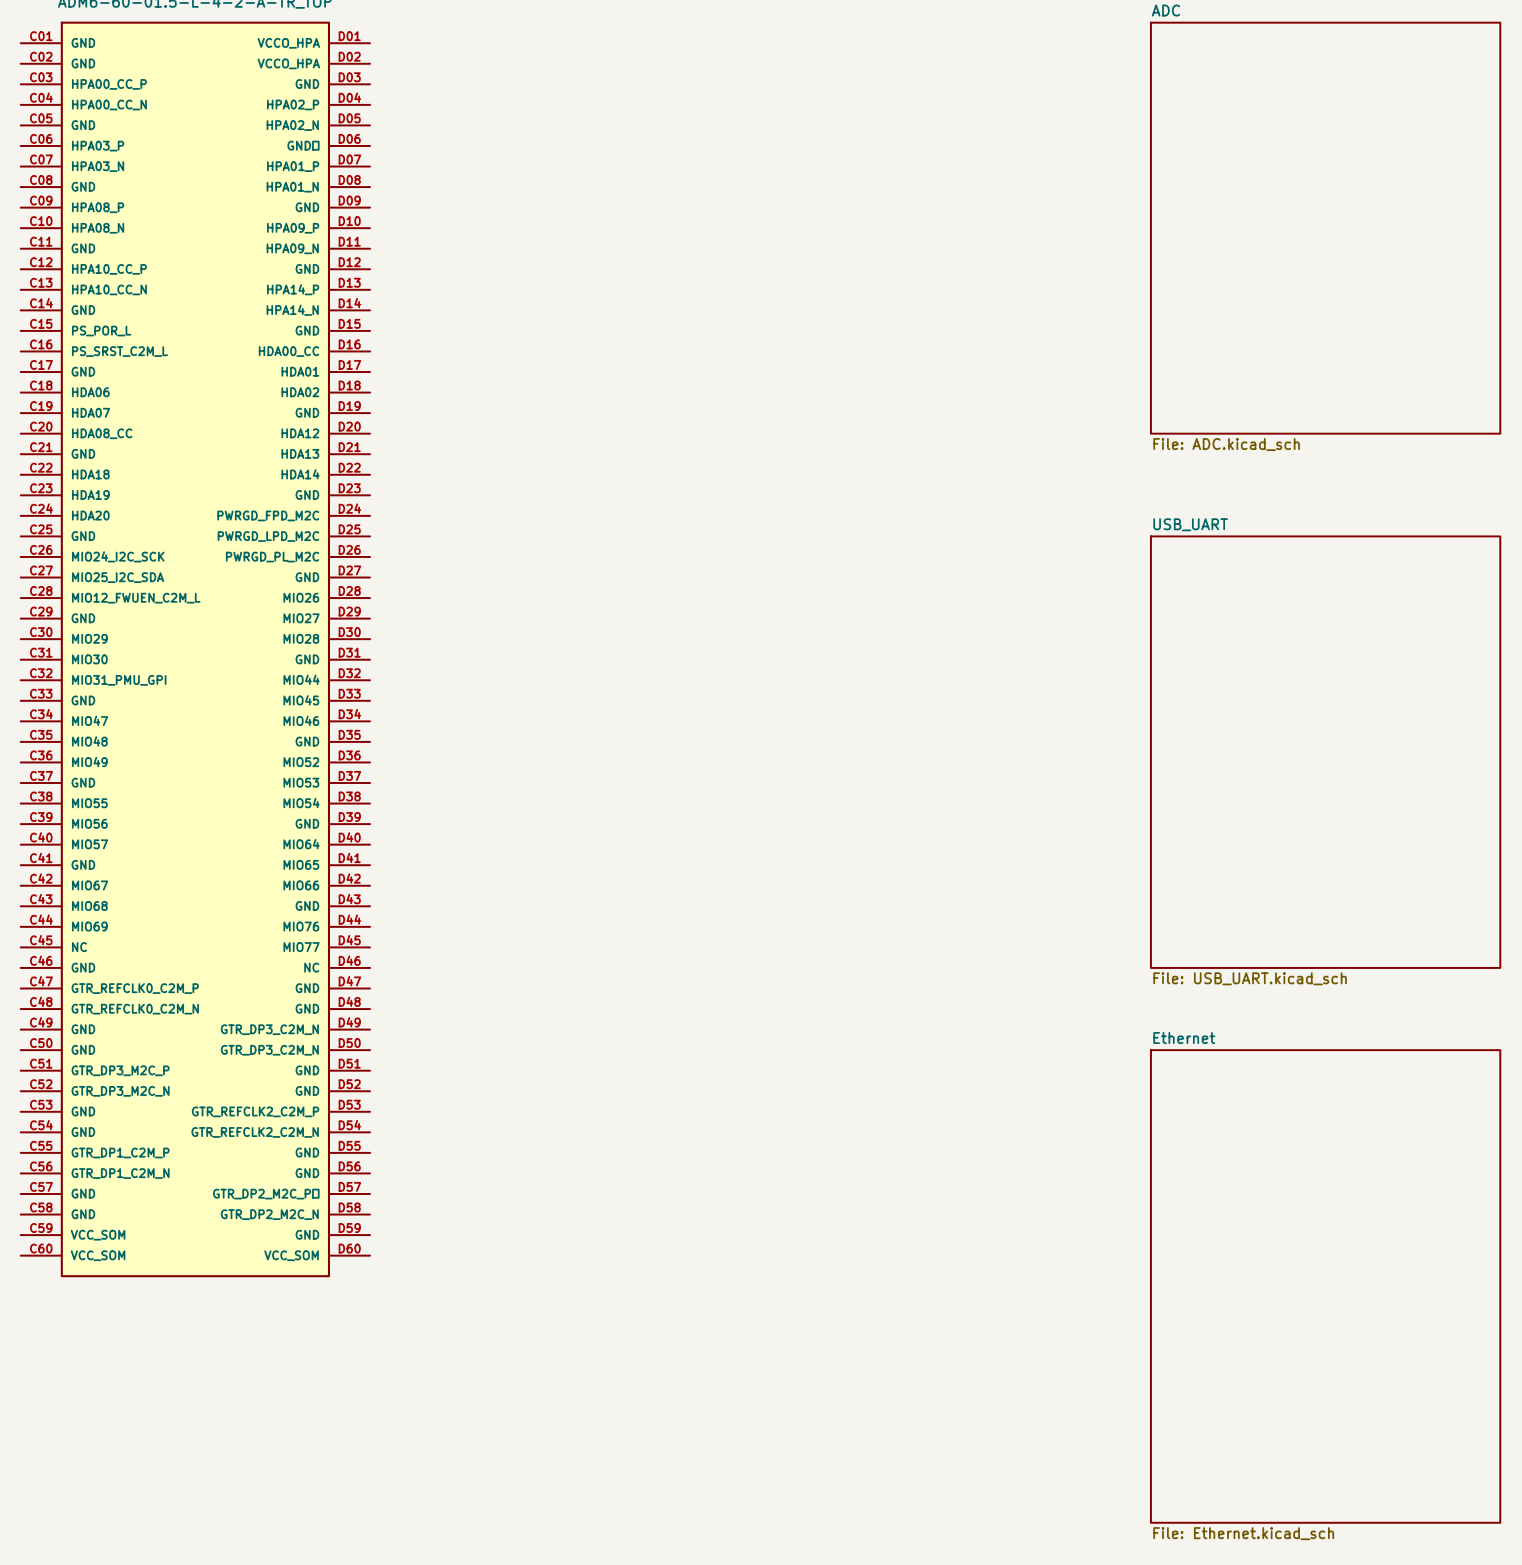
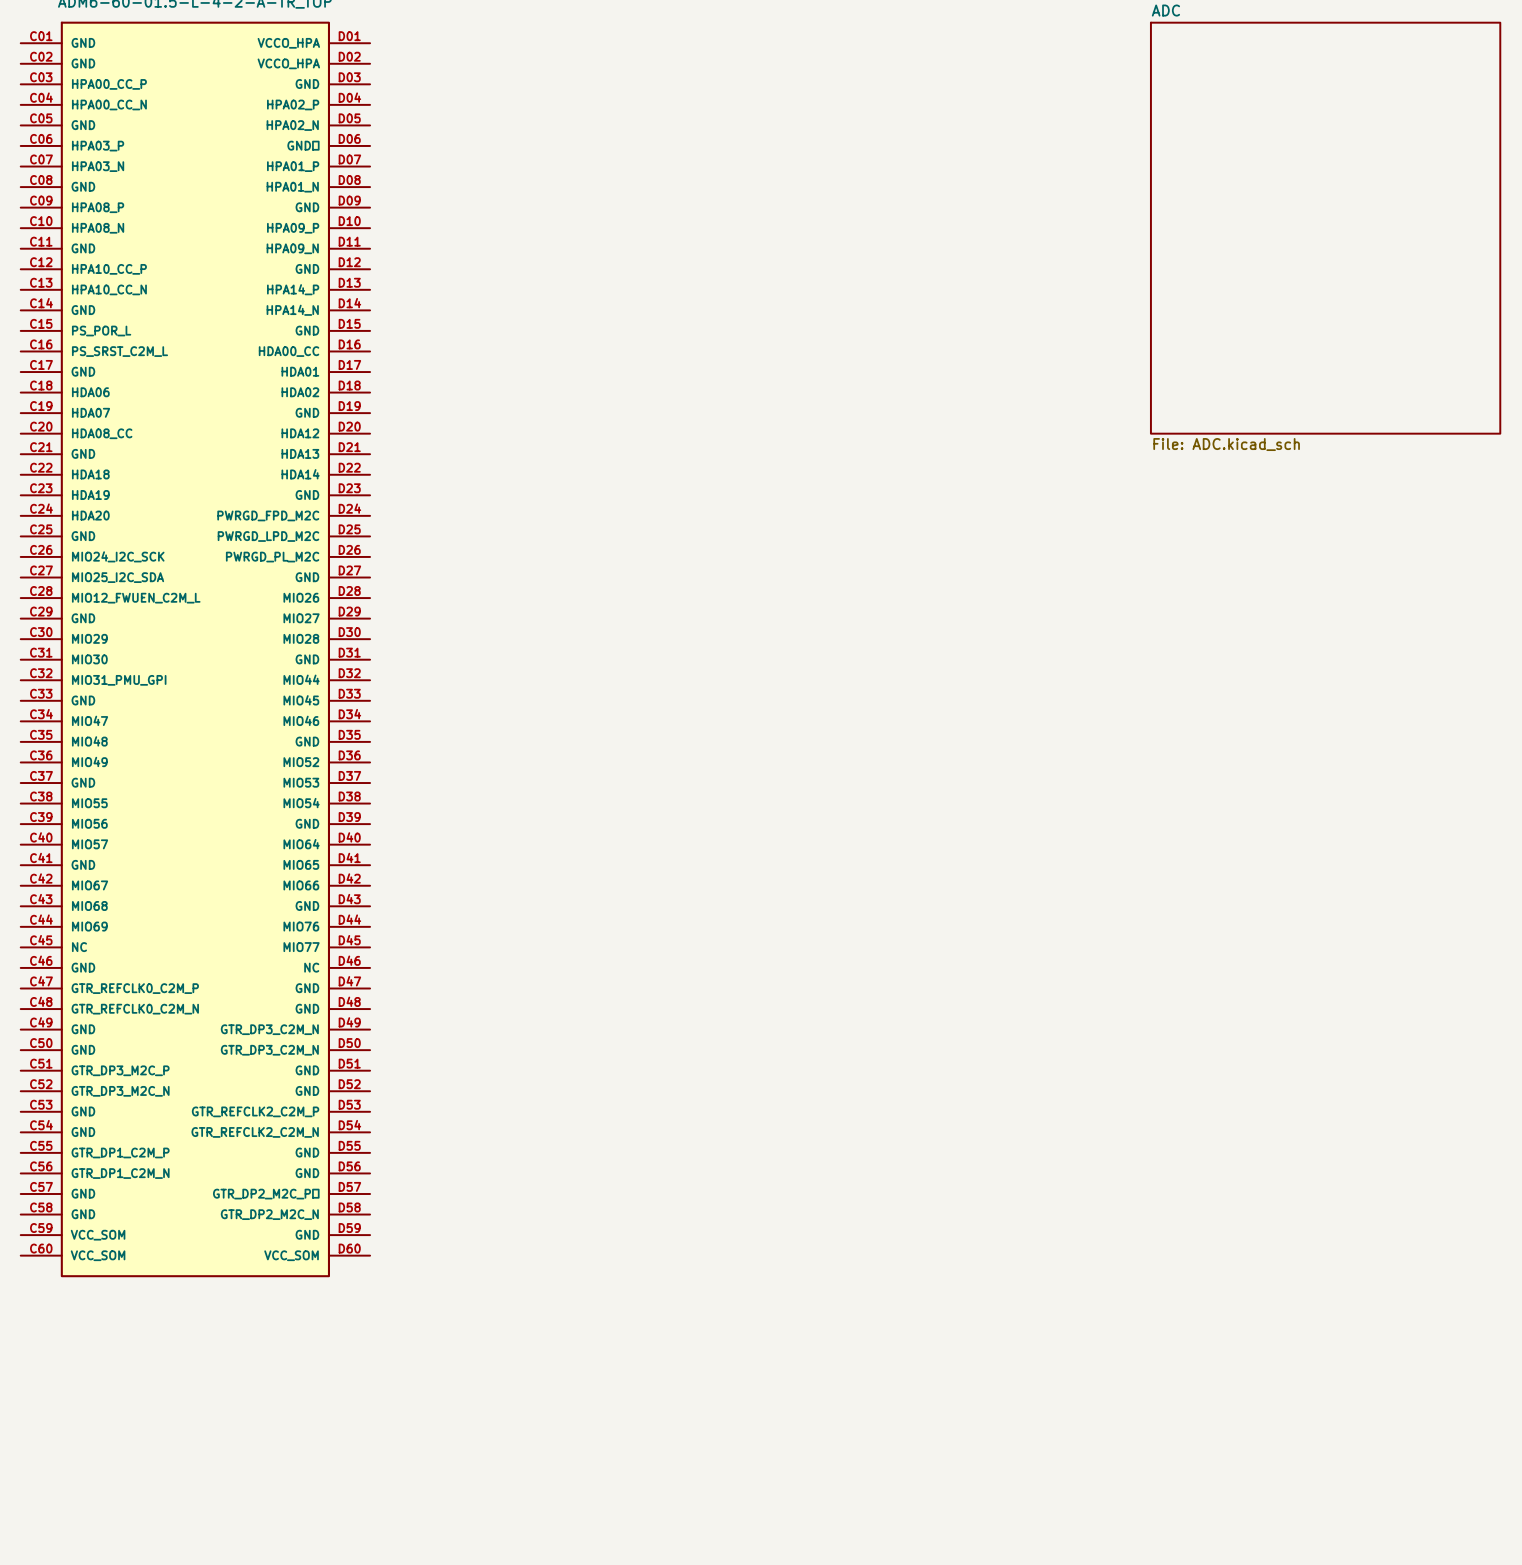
sheet USB_UART: File: USB_UART.kicad_sch (1325, 752) -> none
sheet Ethernet: File: Ethernet.kicad_sch (1325, 1286) -> none

